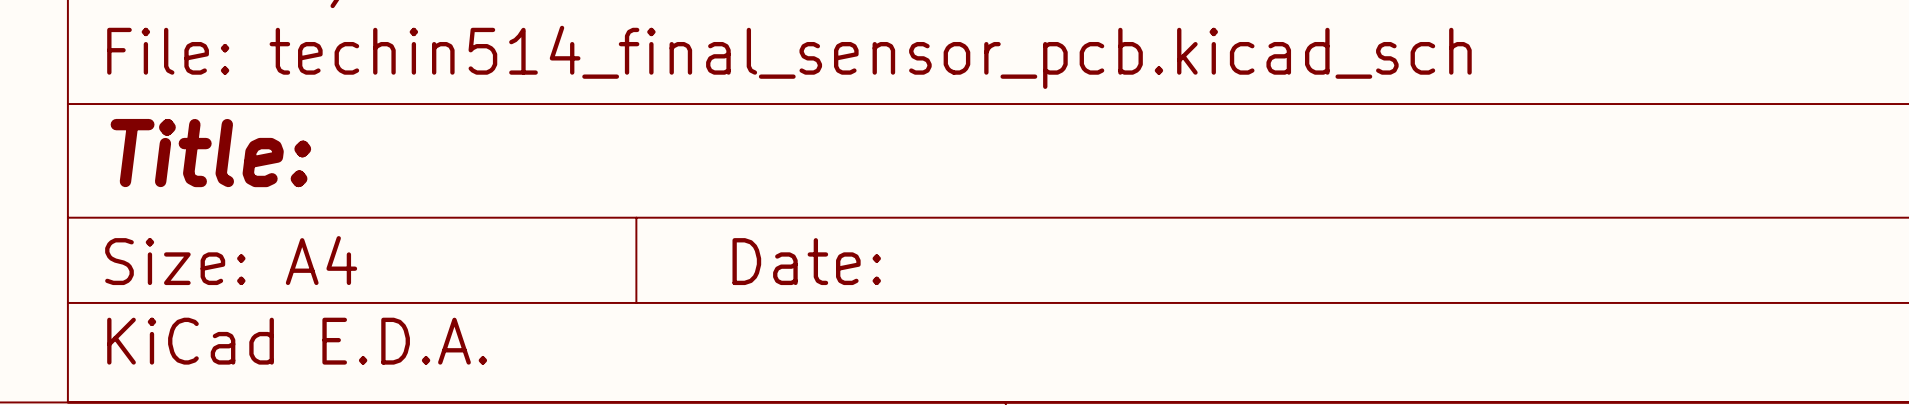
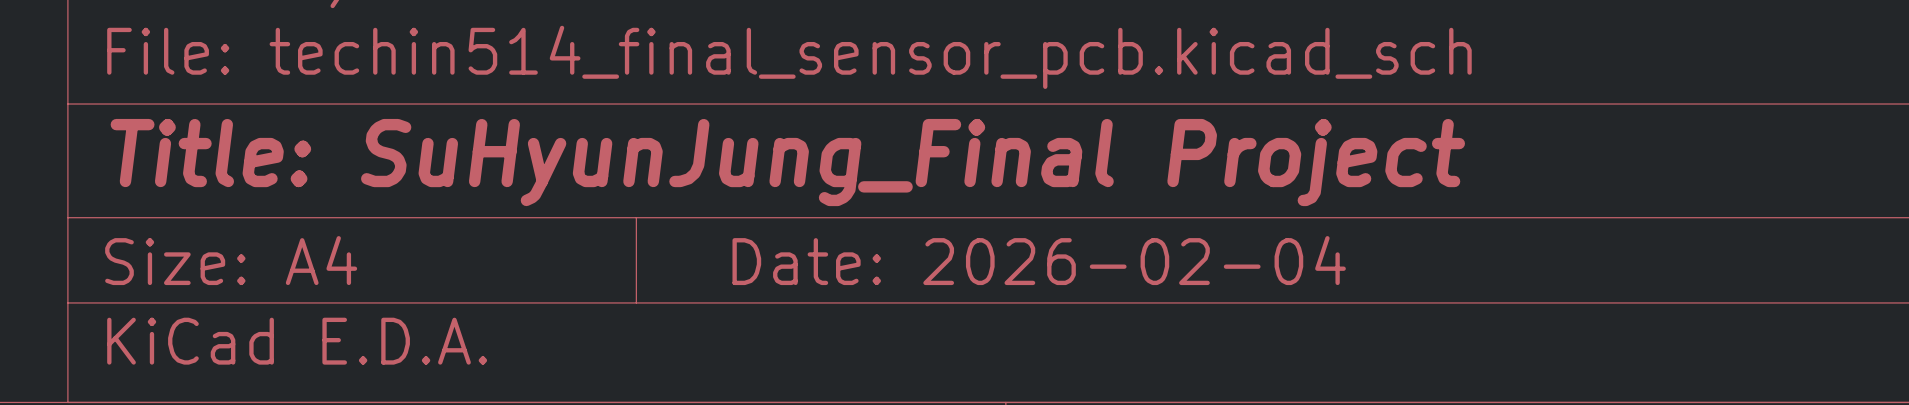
title block: Title: (210, 153) -> Title: SuHyunJung_Final Project (787, 162)
title block: Date: (806, 261) -> Date: 2026-02-04 (1039, 260)

